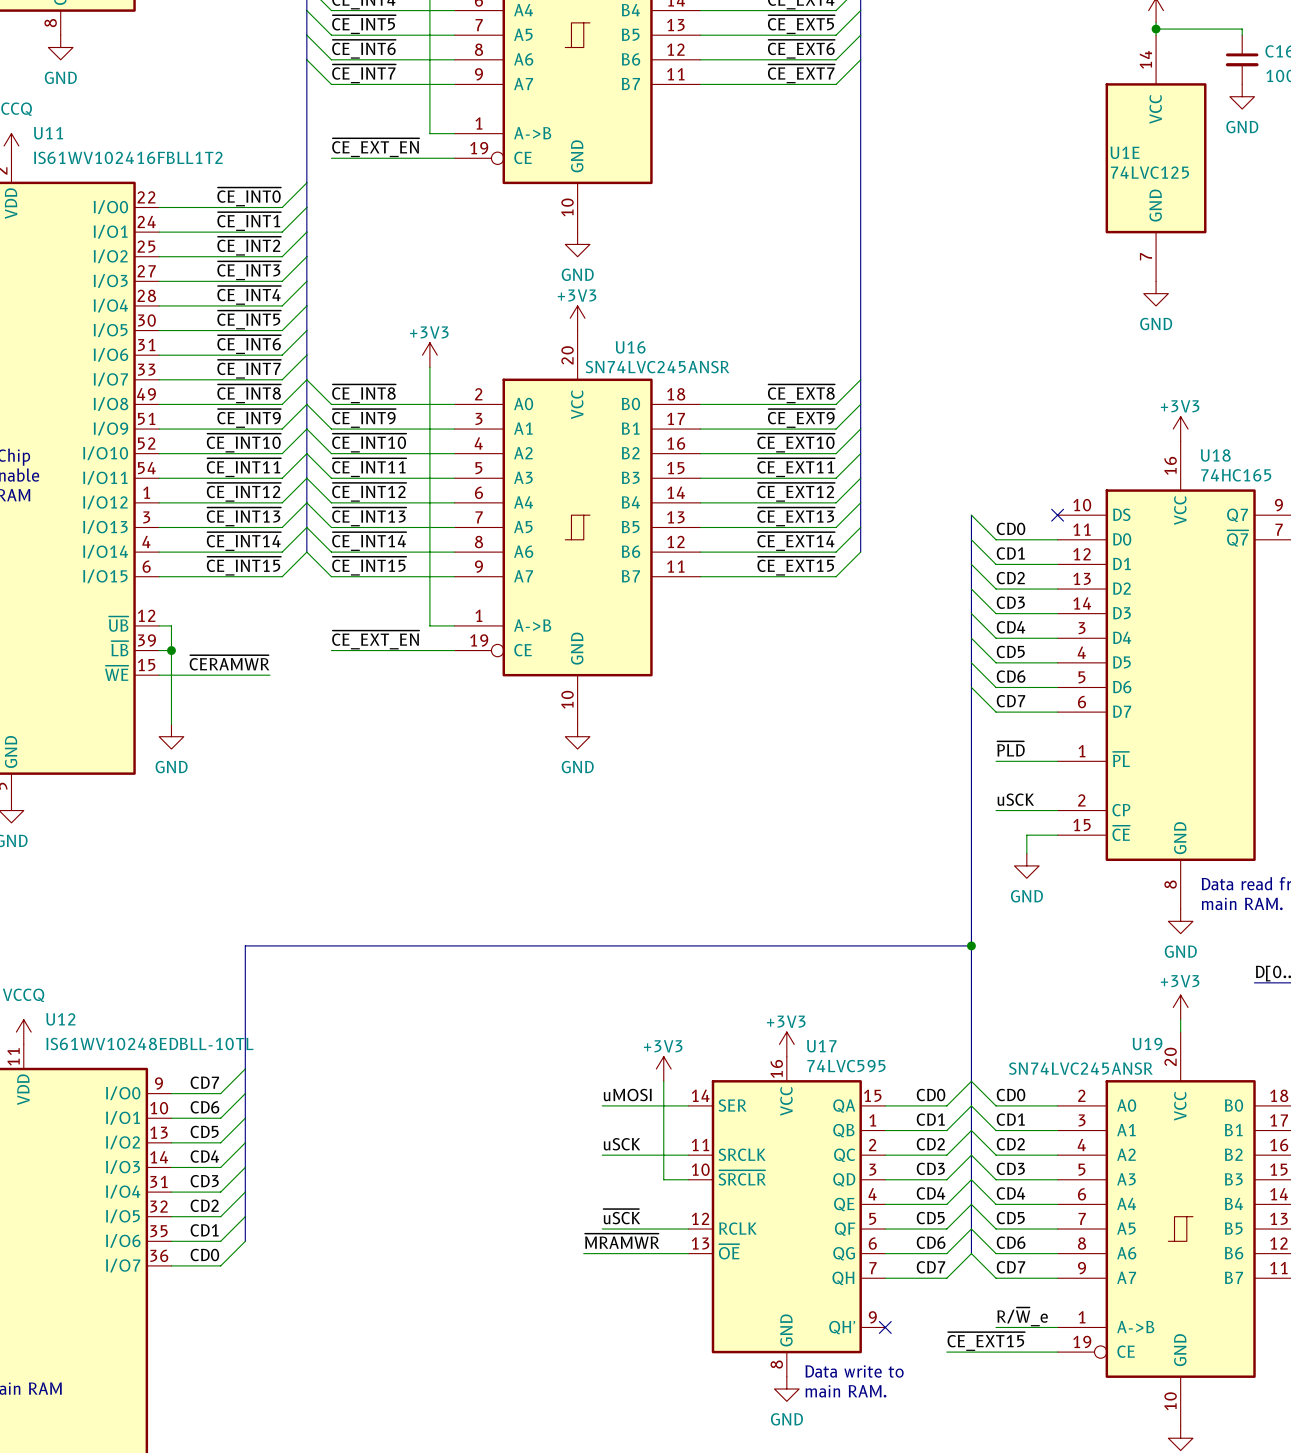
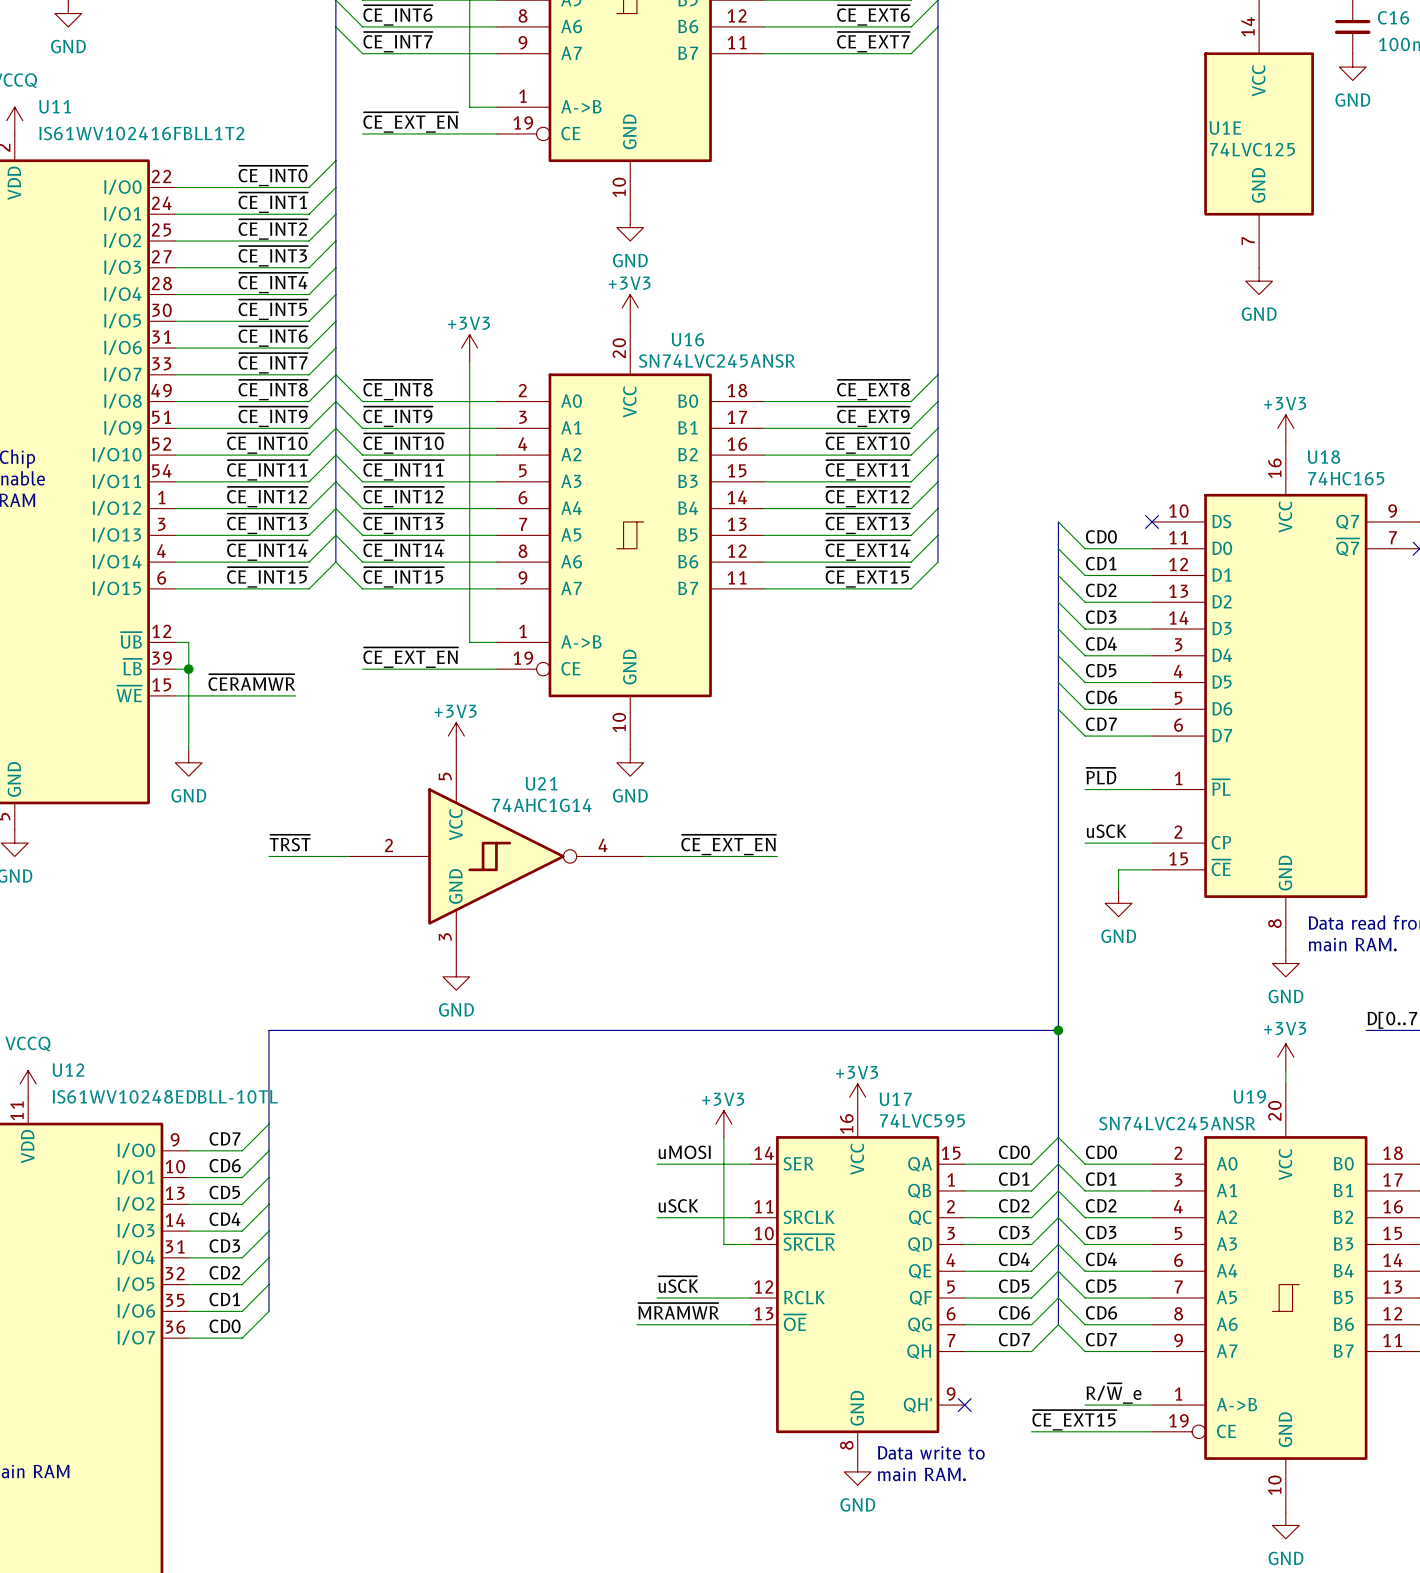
power symbol: none -> +3V3 (456, 736)
label: none -> ~{TRST} (290, 843)
label: none -> ~{CE_EXT_EN} (728, 844)
wire: none -> (268, 856) (349, 856)
U21: none -> 74AHC1G14 (496, 856)
wire: none -> (643, 856) (777, 856)
power symbol: none -> GND (456, 976)
bus: (971, 945) (245, 945) (245, 982) -> (1058, 1030) (268, 1030)
junction position: (971, 945) -> (1058, 1030)

